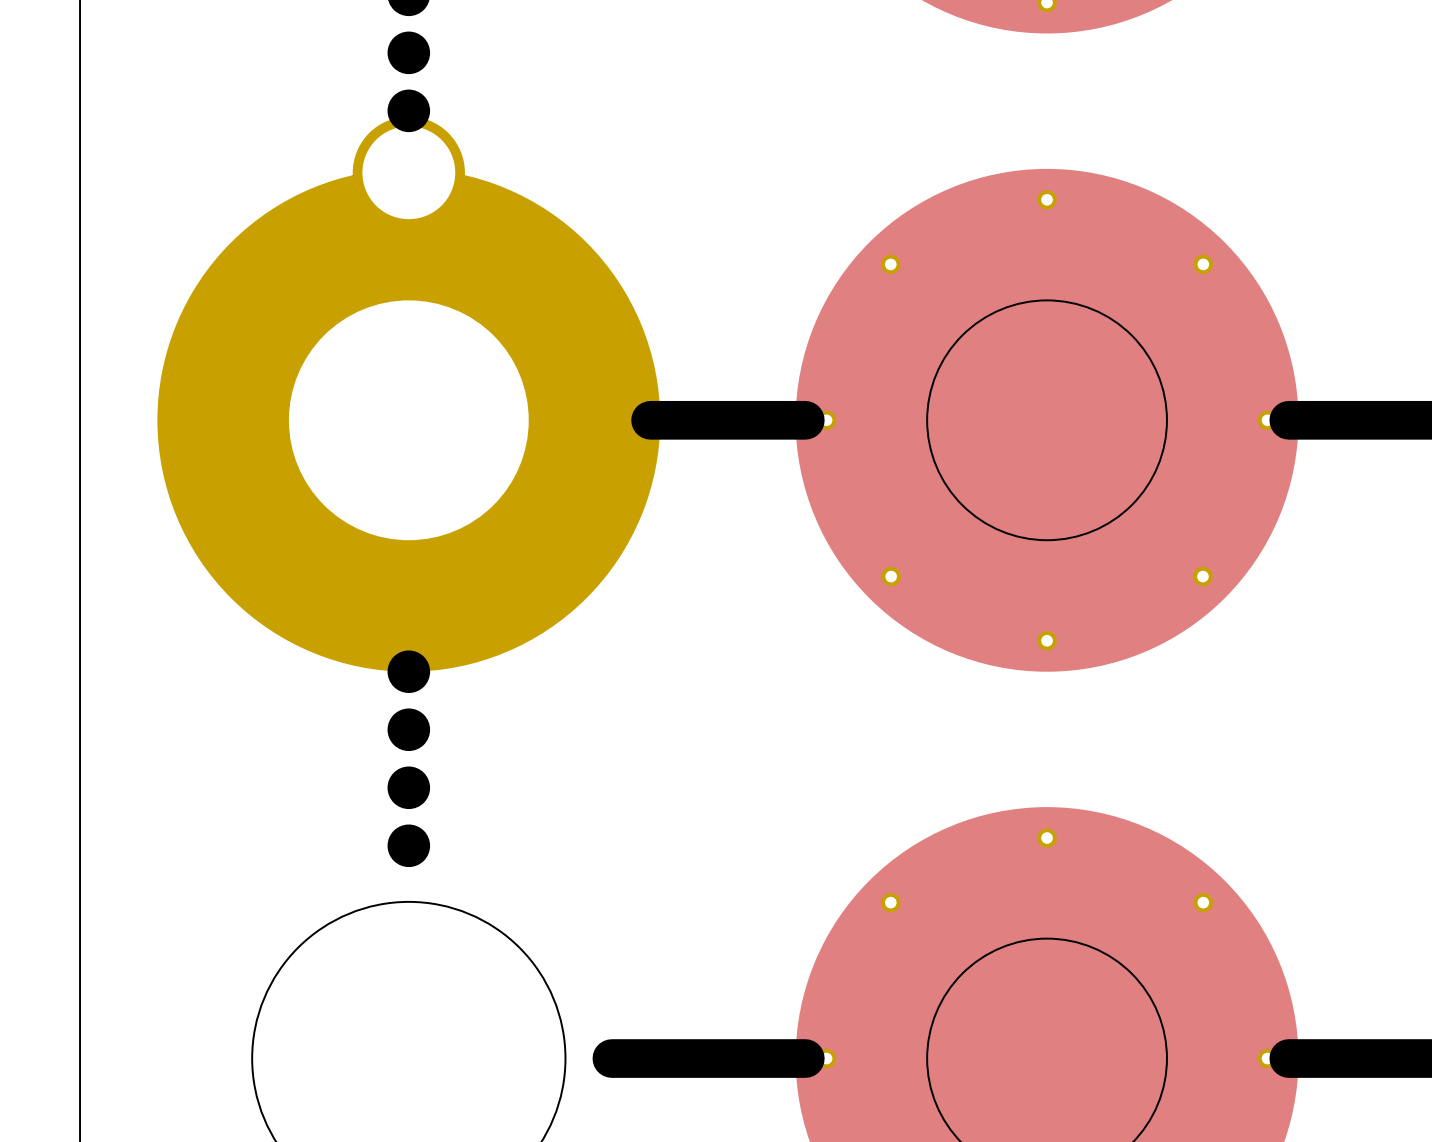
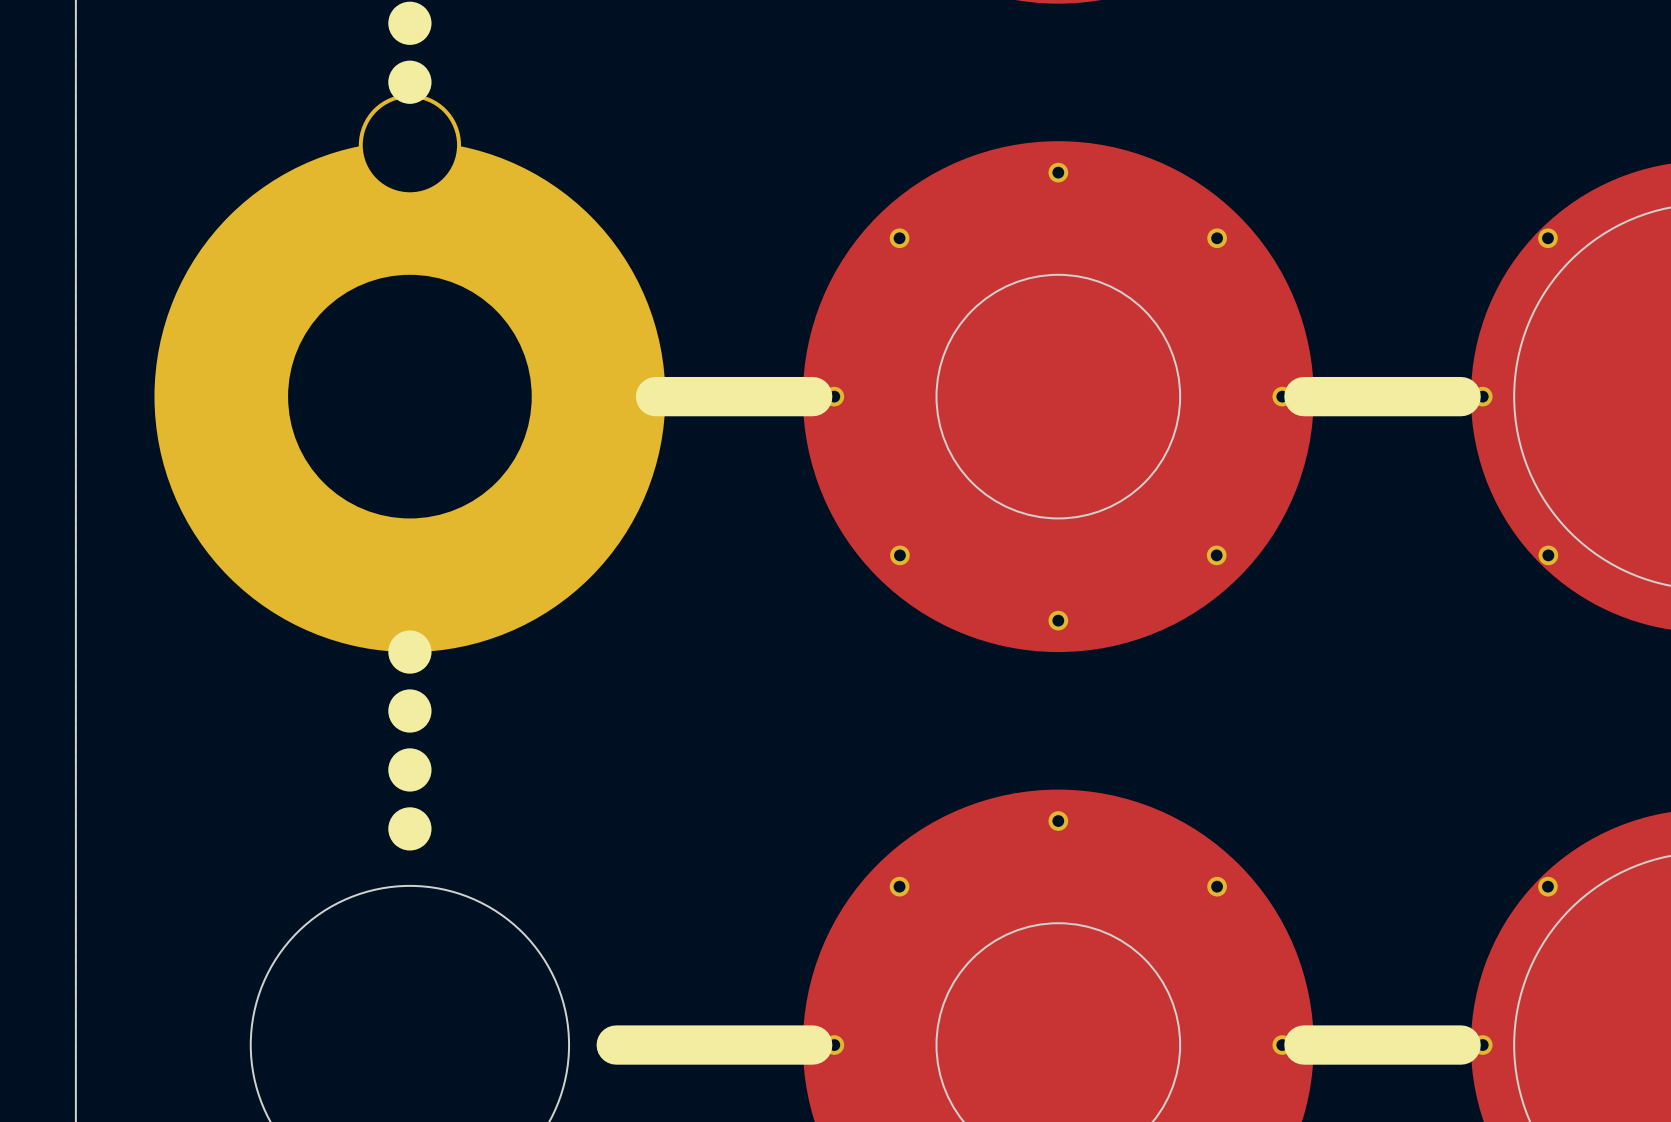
part footprint: [157, 116, 661, 672] -> [154, 94, 666, 653]

